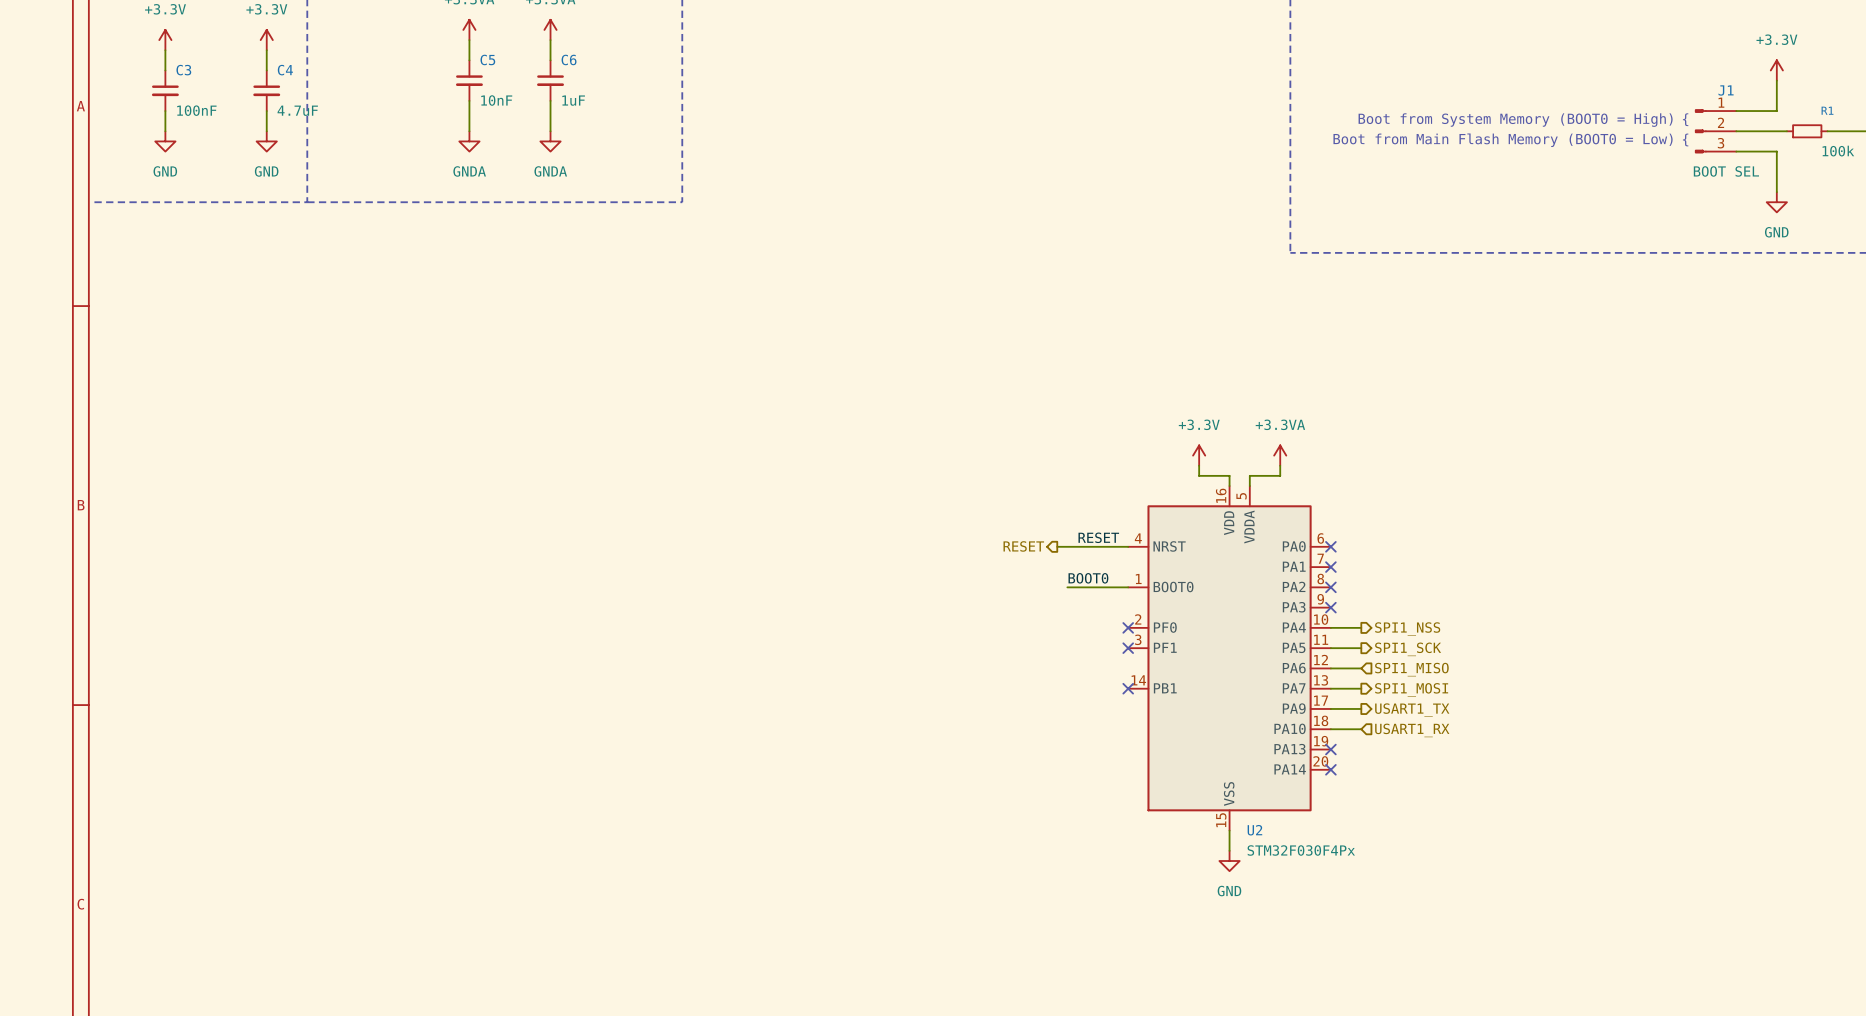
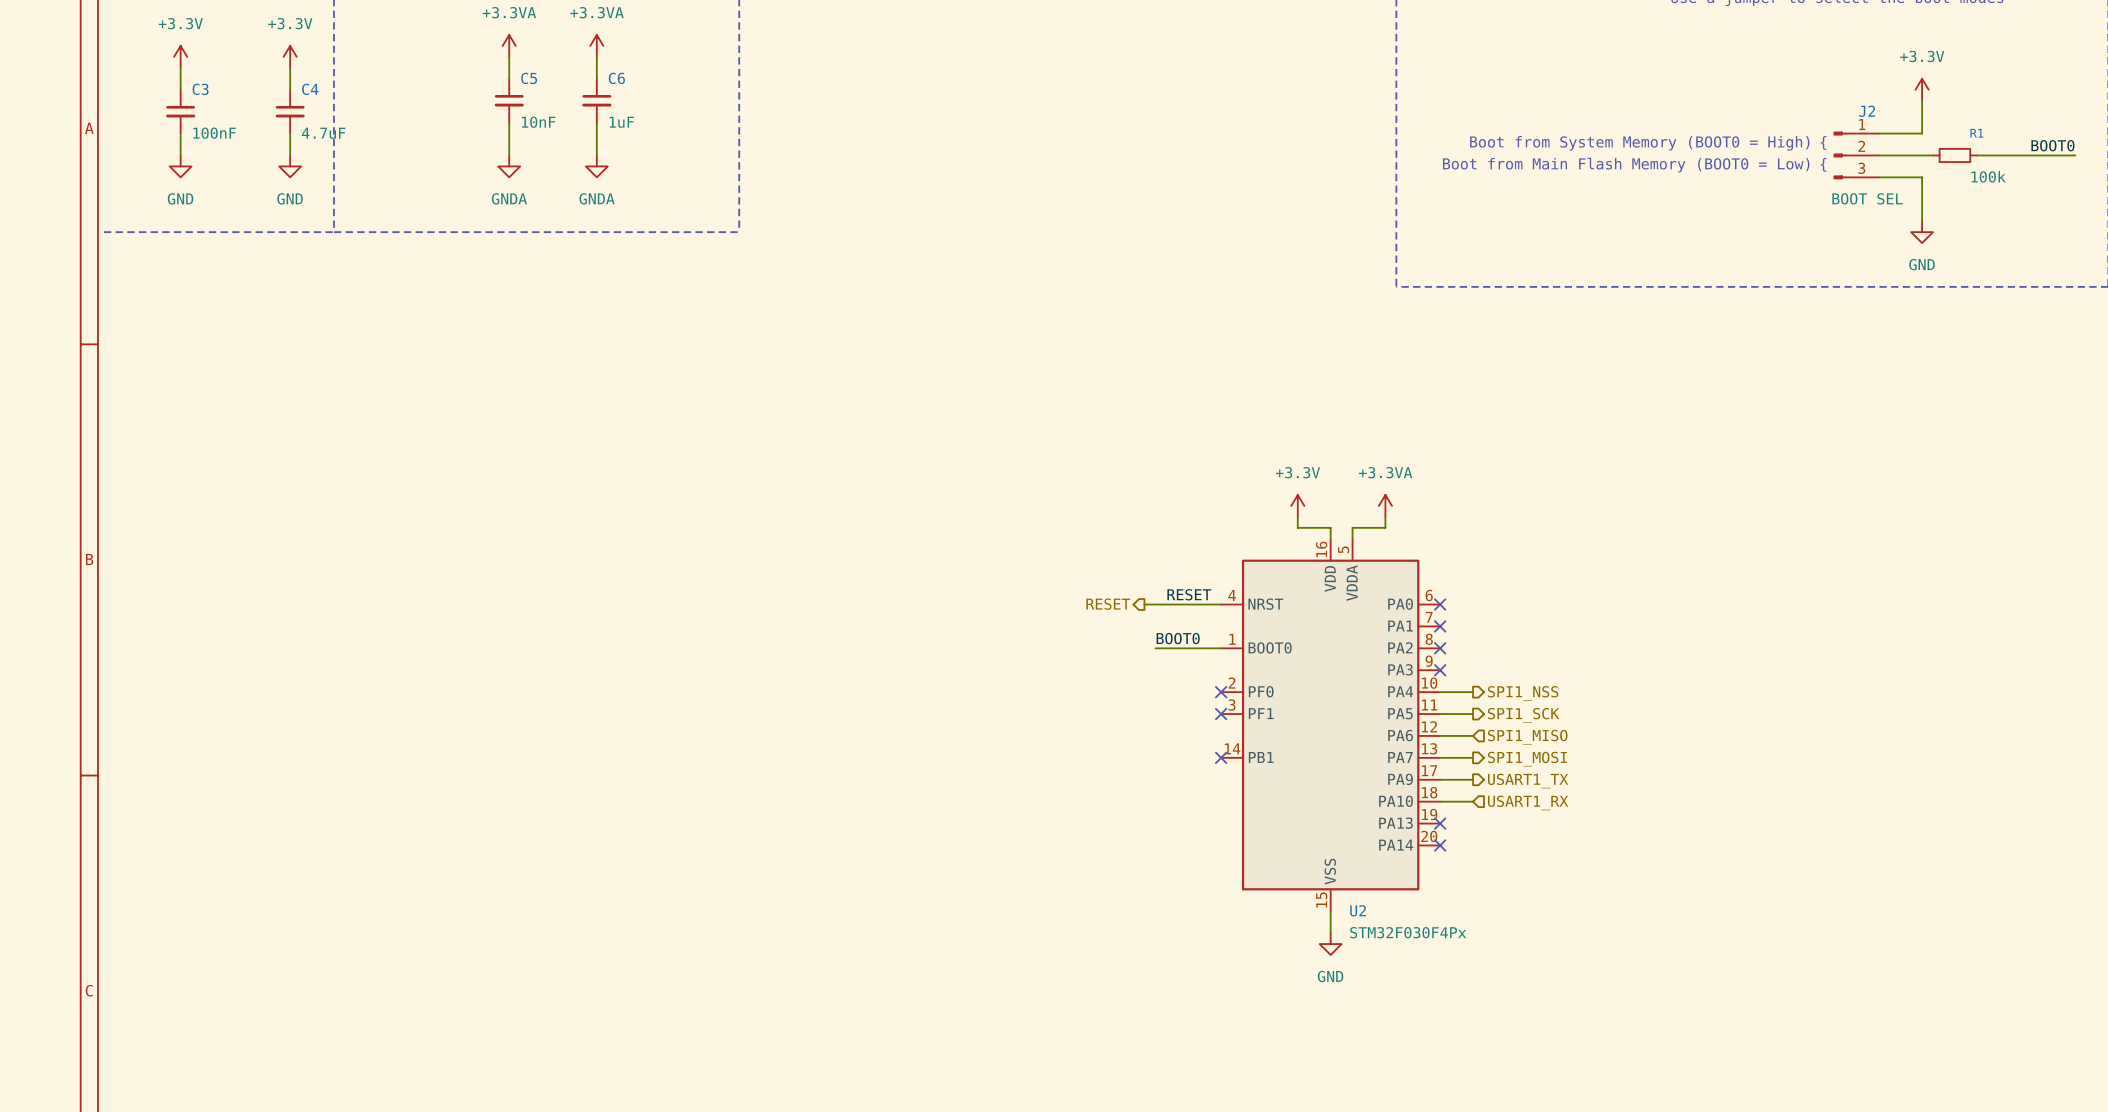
J1 name: J1 (1726, 90) -> J2 (1867, 111)

